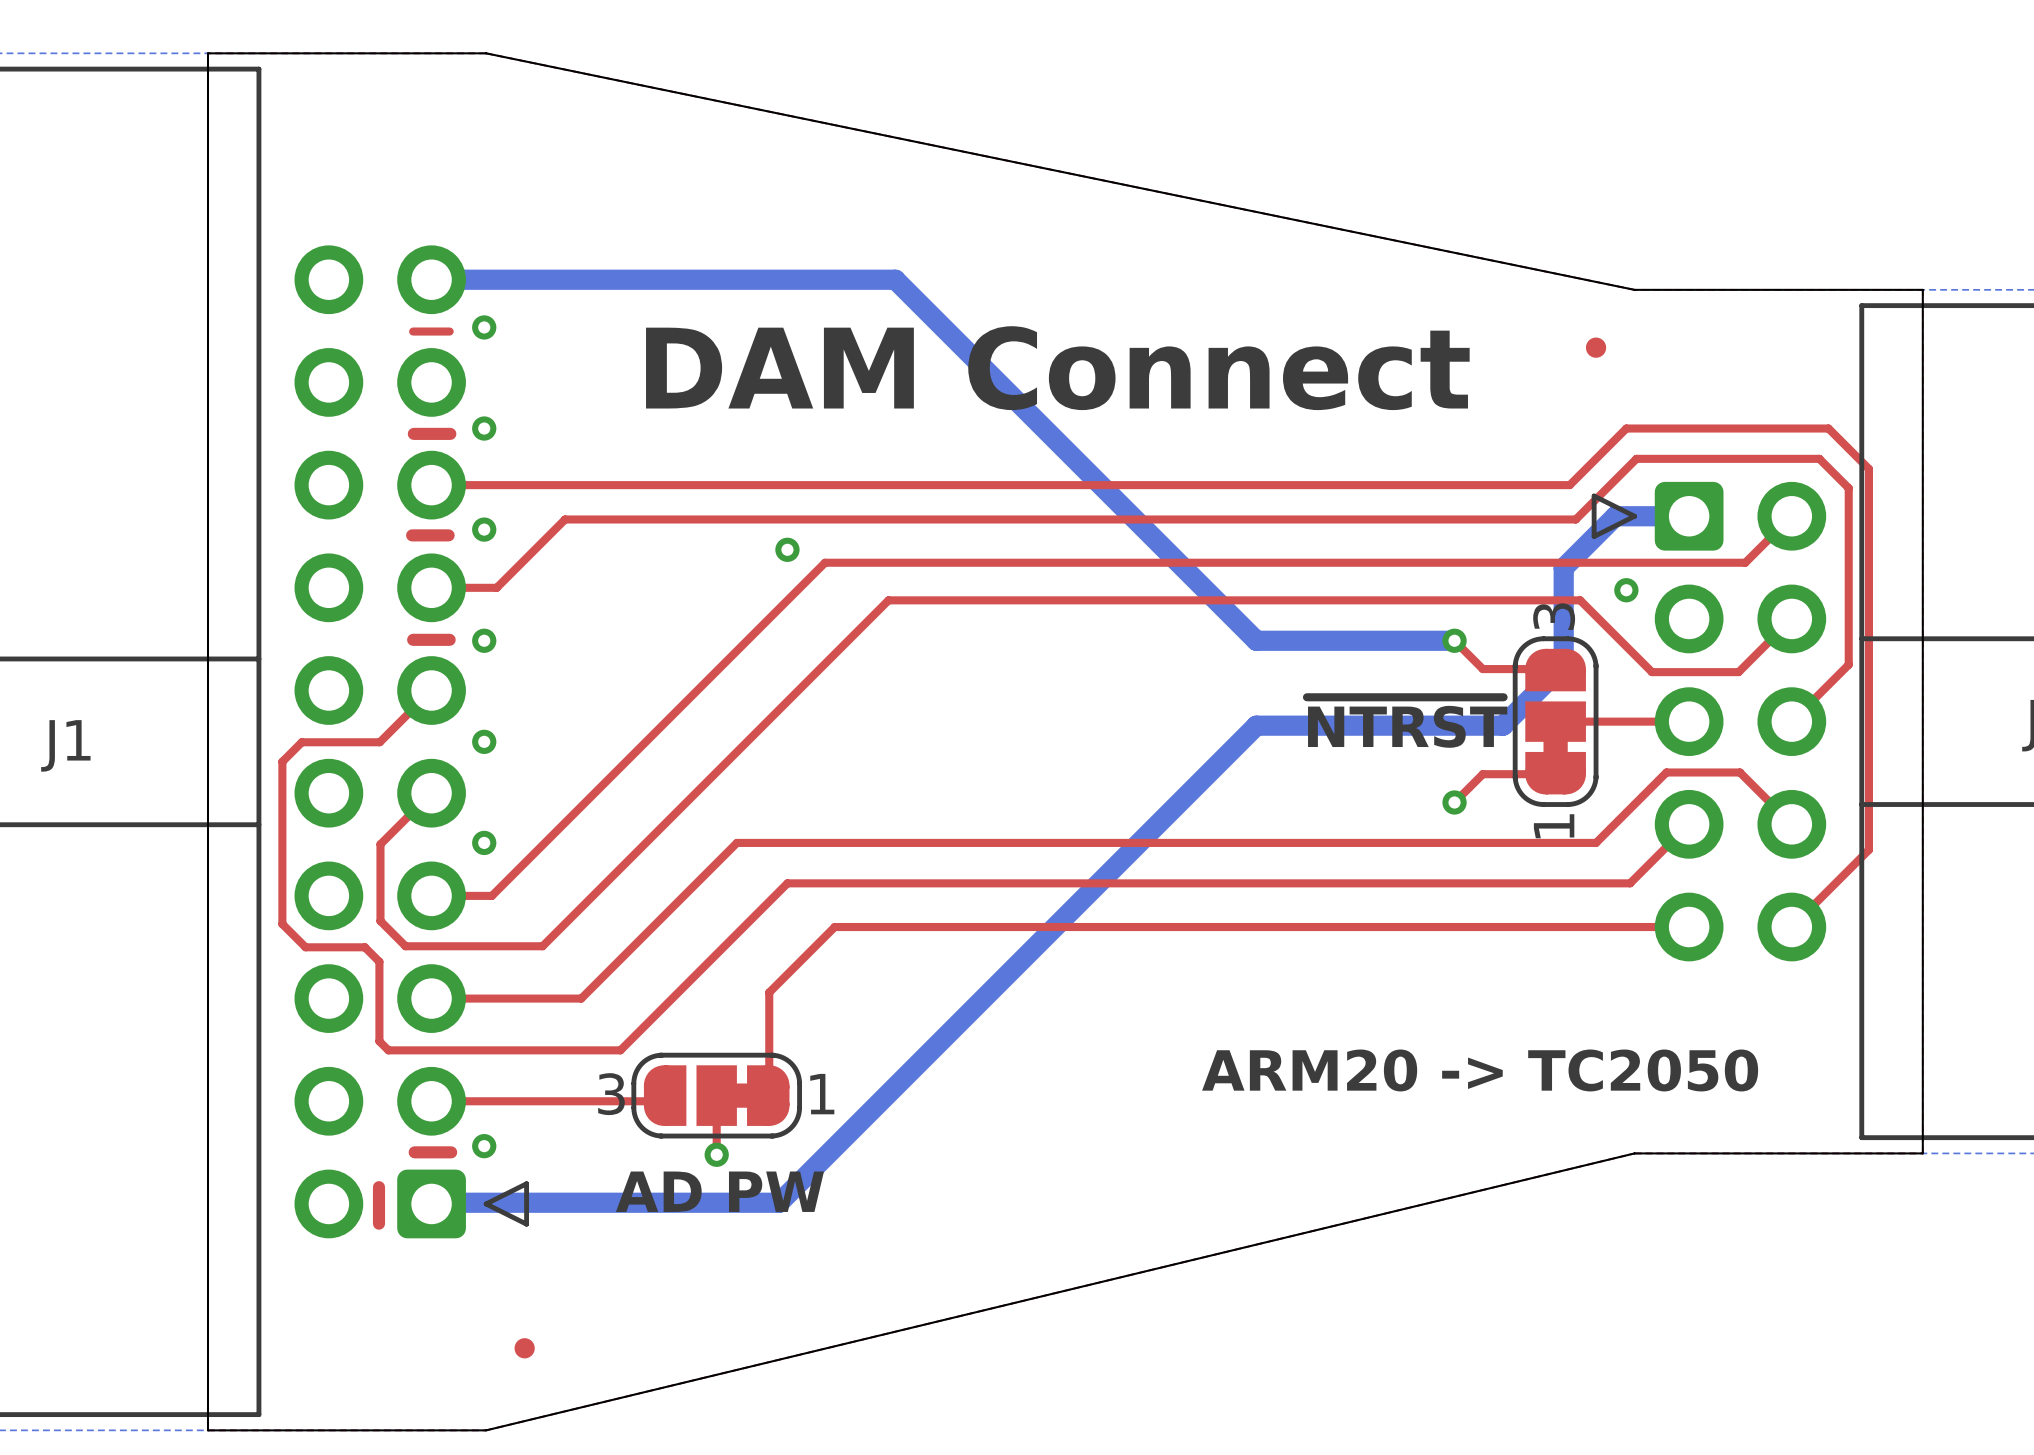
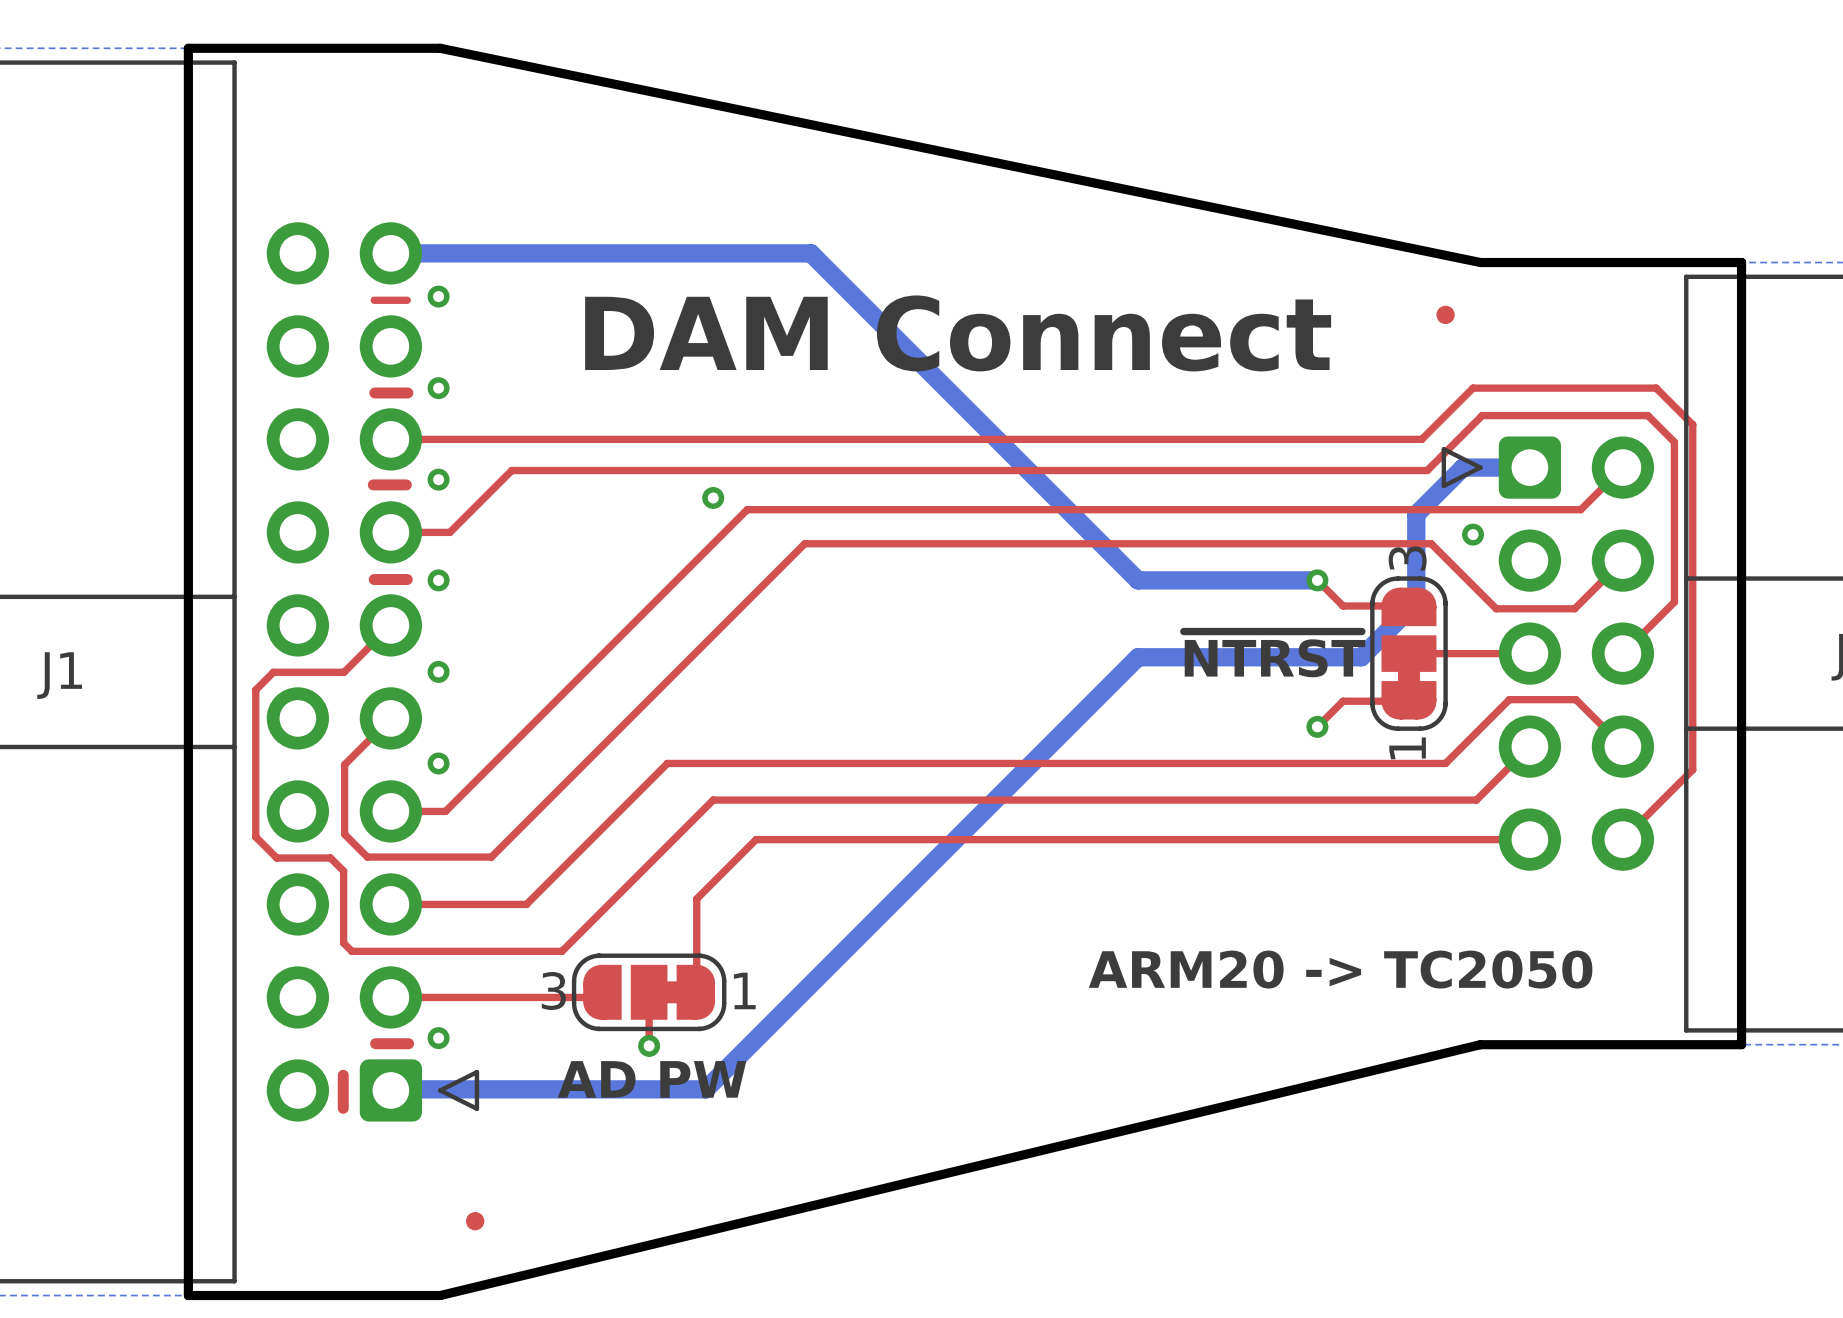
board edge width: thin (207, 53) (207, 1430) (486, 1430) (1634, 1153) (1922, 1153) (1922, 289) (1634, 289) (486, 53) (207, 53) -> thick (188, 48) (188, 1295) (440, 1295) (1480, 1044) (1741, 1044) (1741, 262) (1480, 262) (440, 48) (188, 48)

